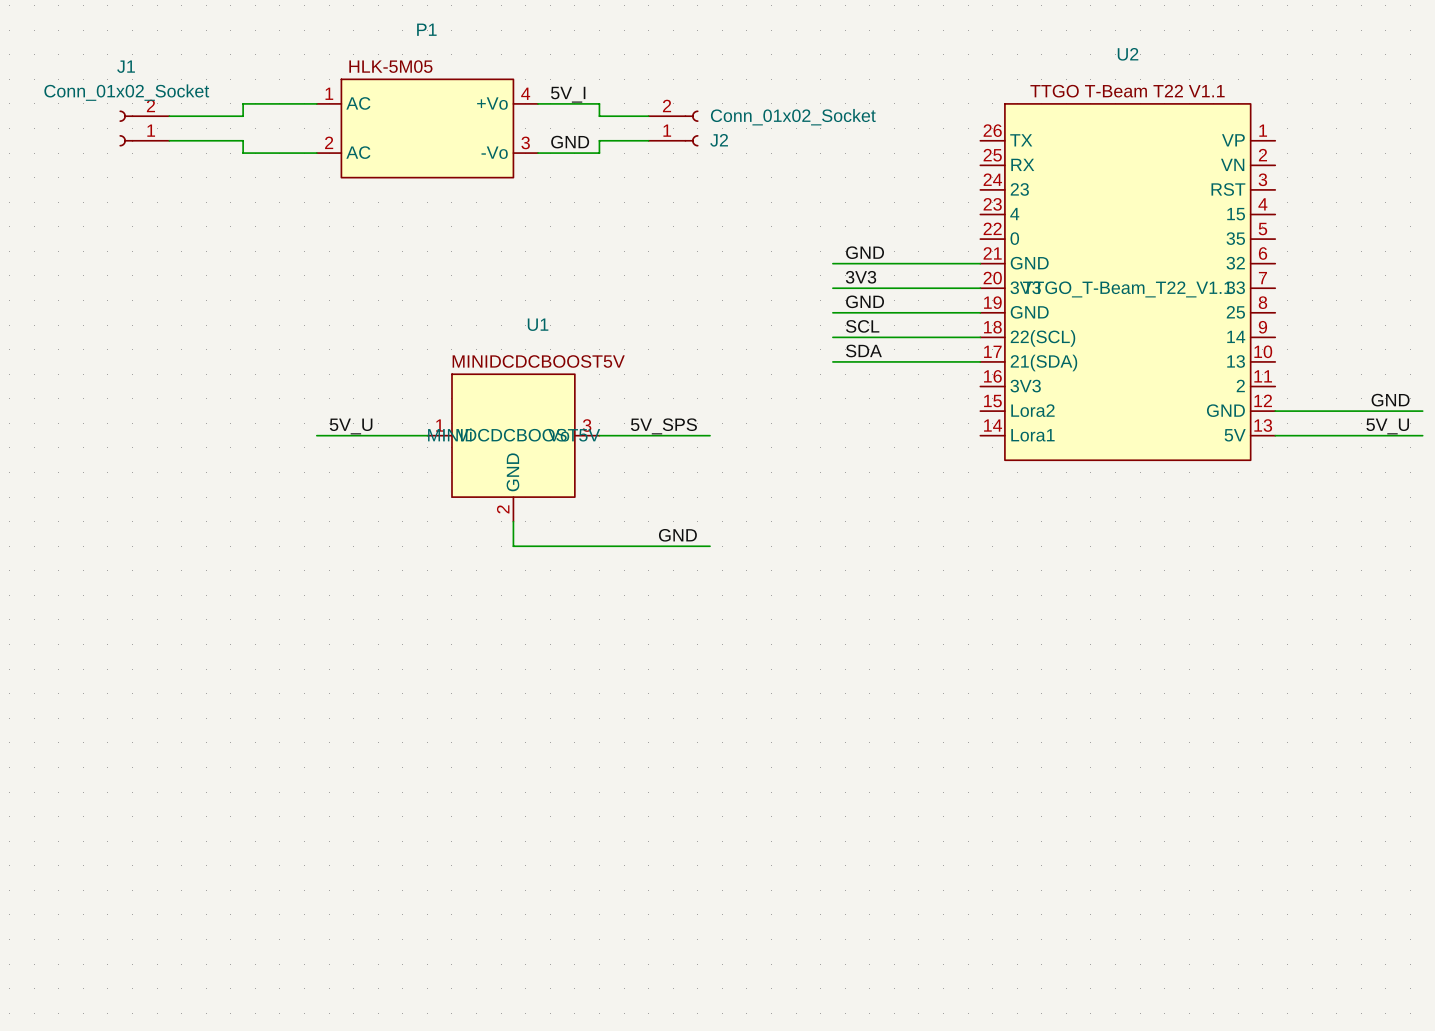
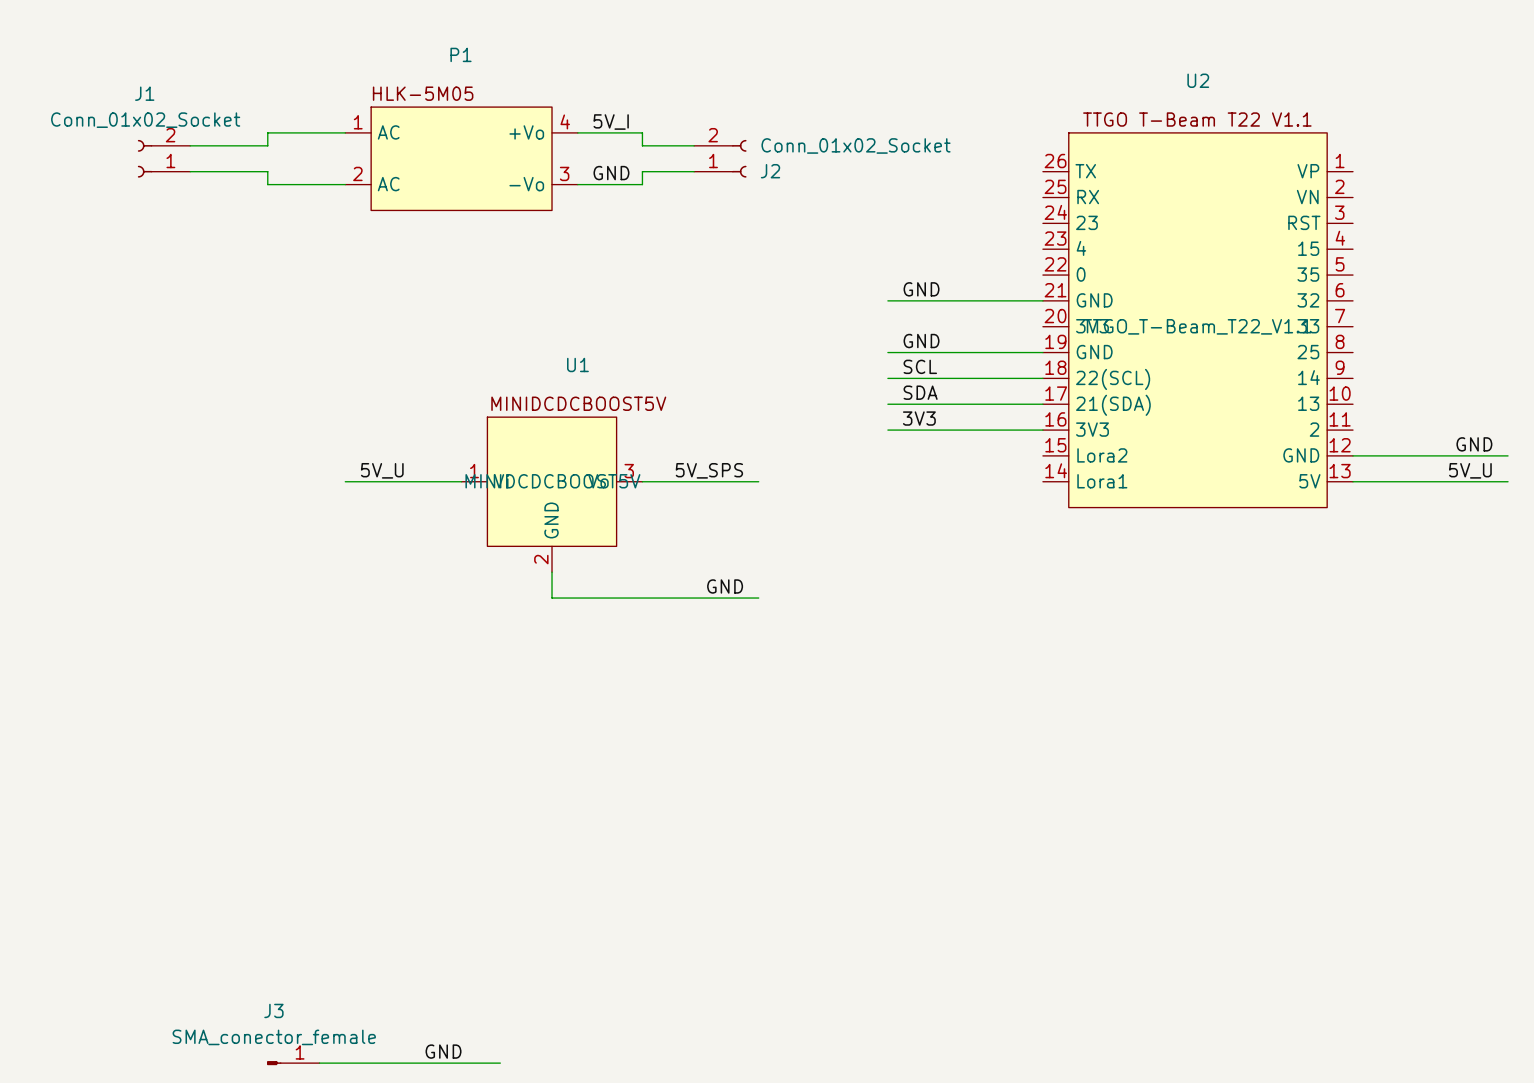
label position: 3V3 (861, 277) -> 3V3 (919, 418)
wire: (832, 288) (980, 288) -> (887, 430) (1042, 430)
label: none -> GND (443, 1051)
J3: none -> SMA_conector_female (293, 1063)
wire: none -> (319, 1063) (500, 1063)

